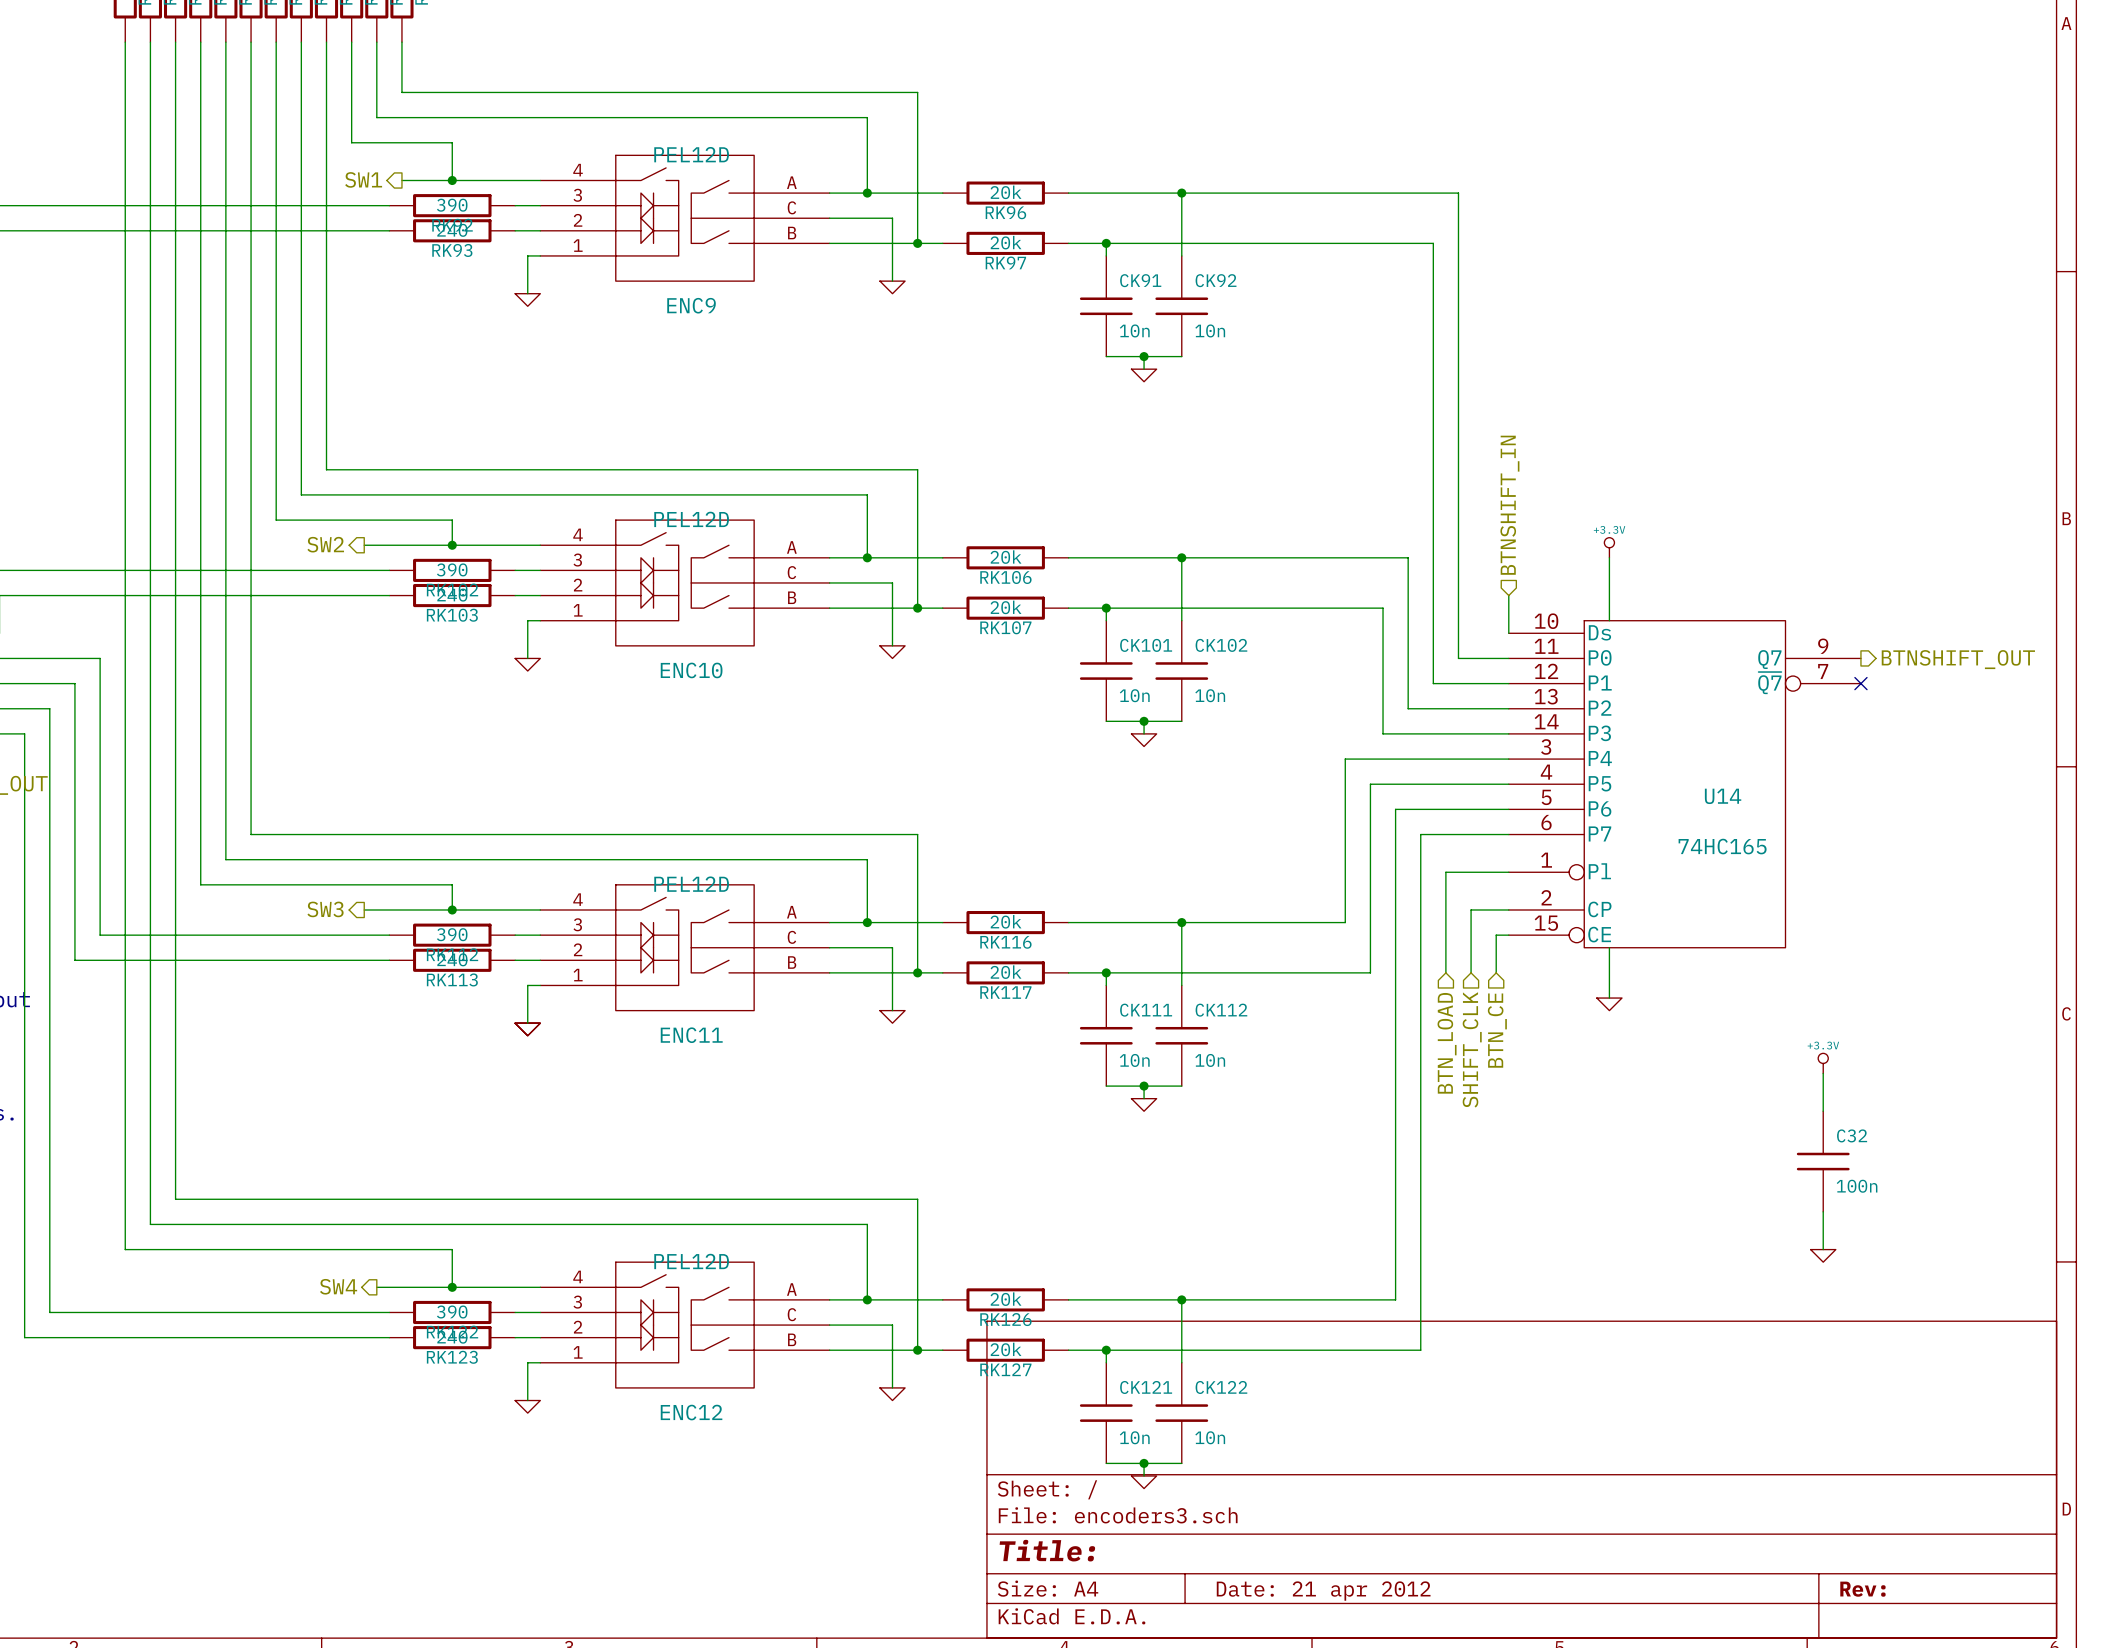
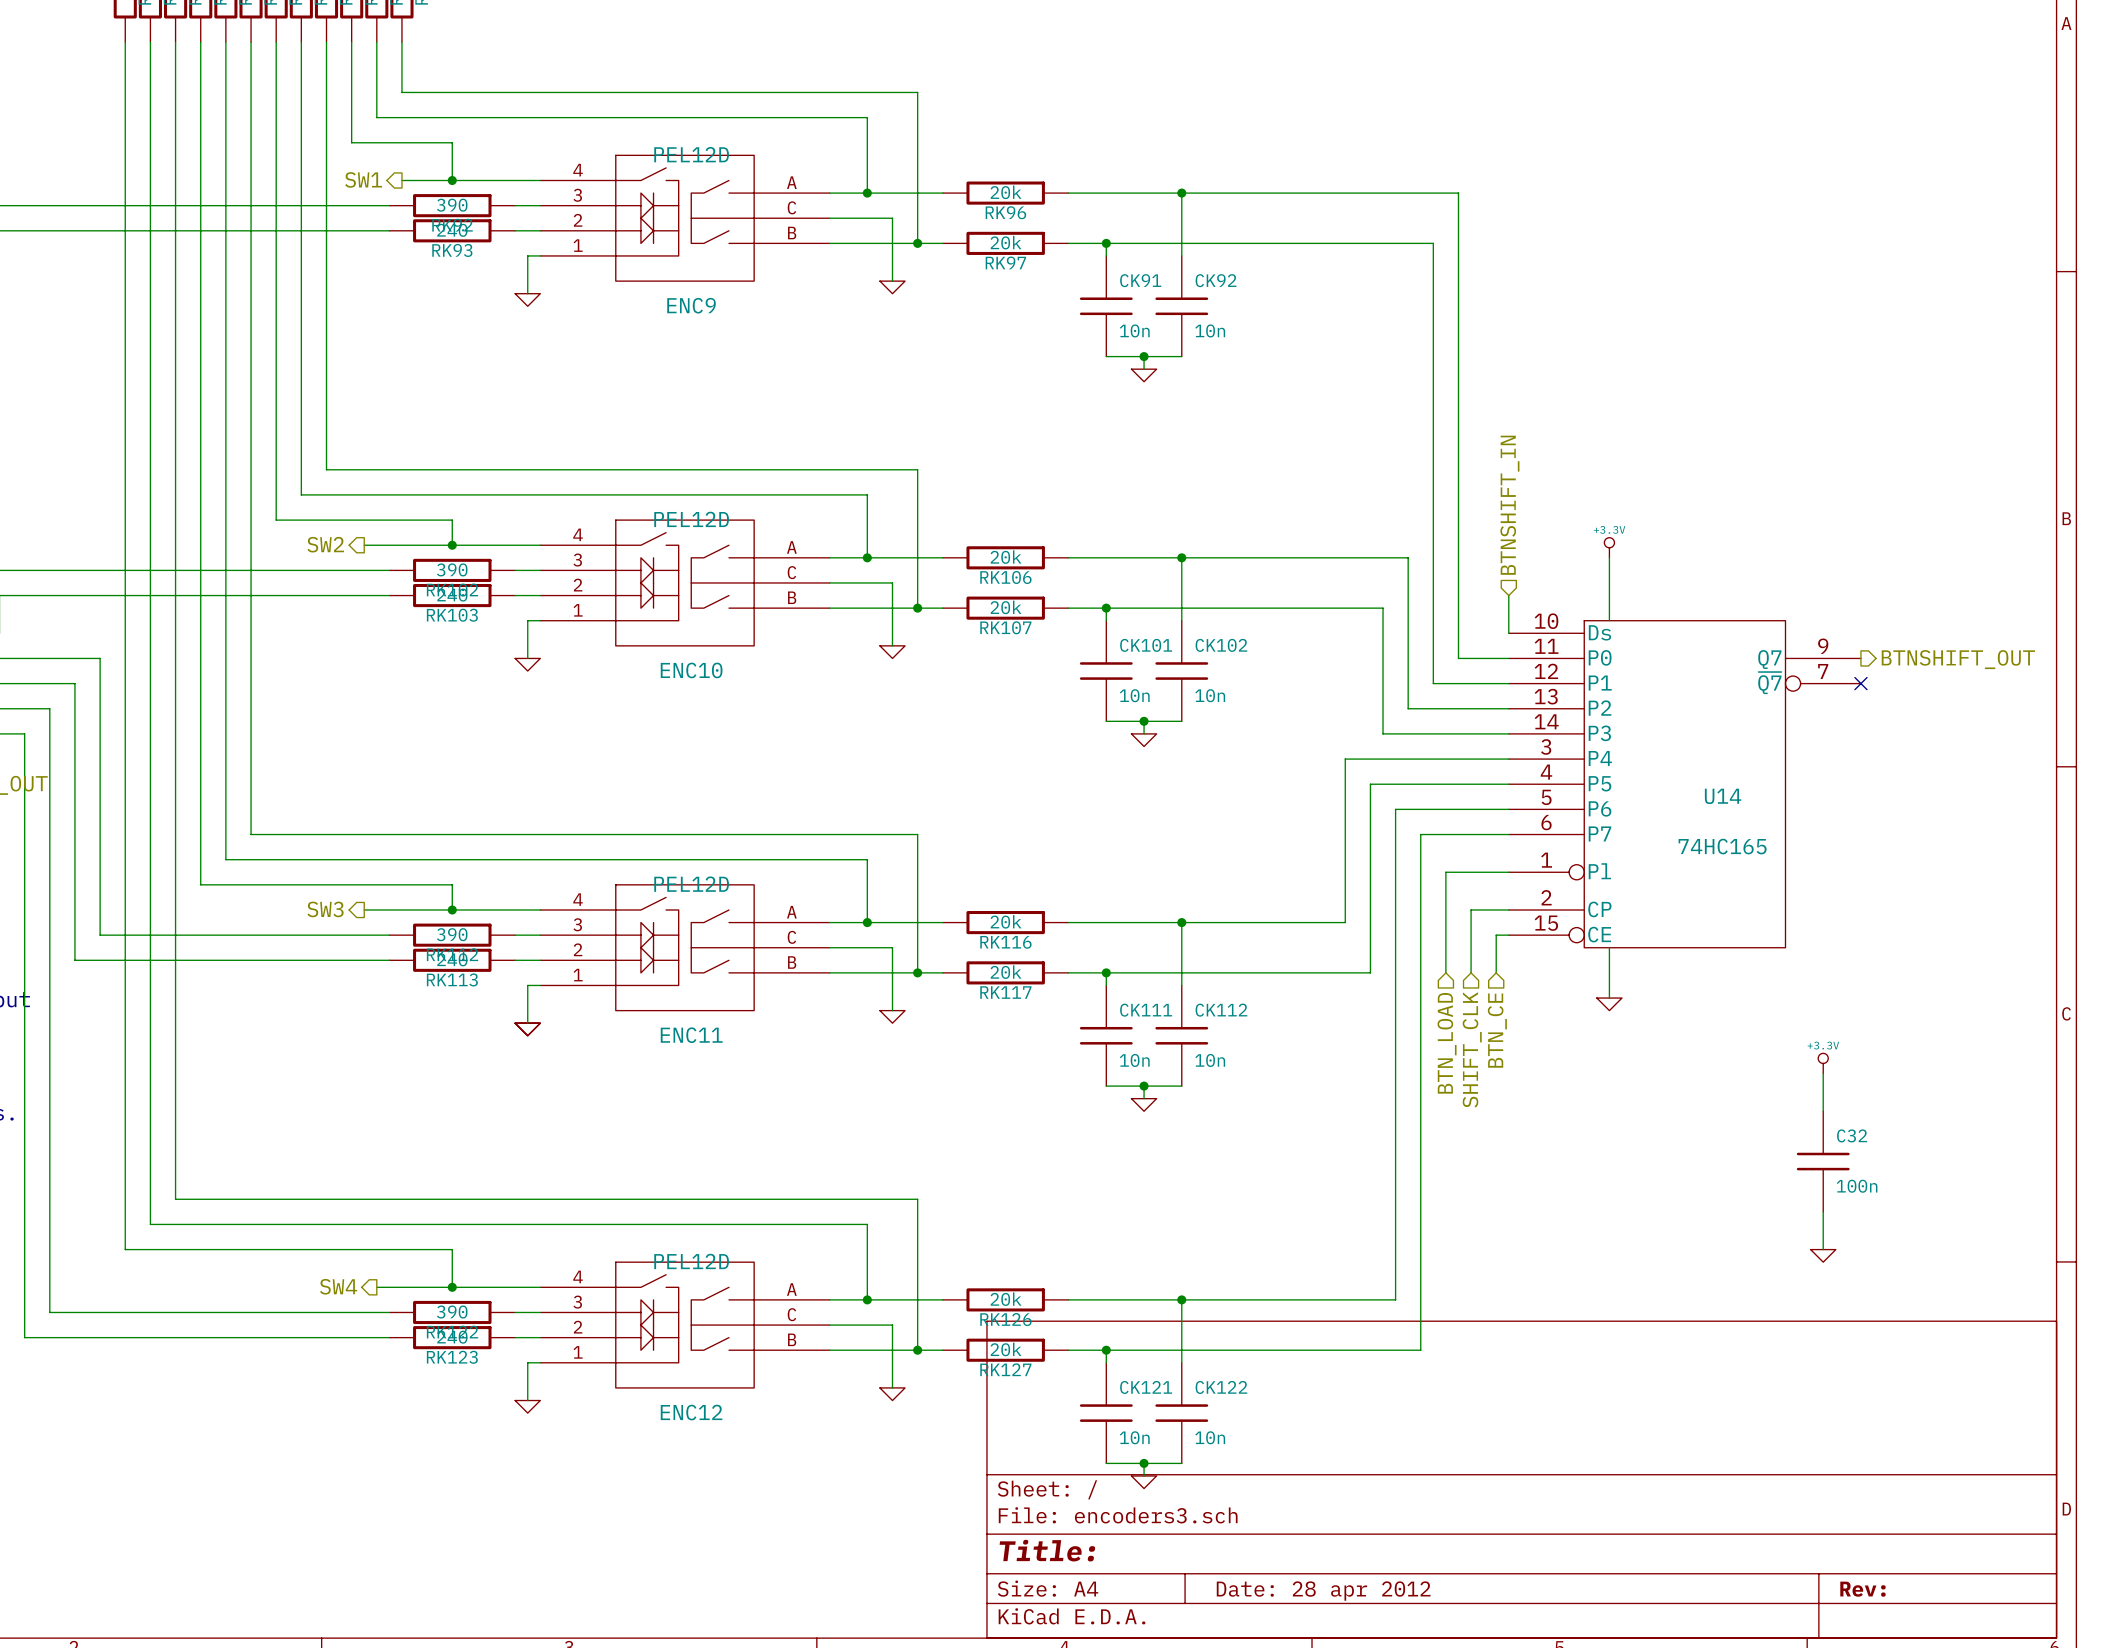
title block: Date: 21 apr 2012 (1323, 1591) -> Date: 28 apr 2012 (1323, 1591)

